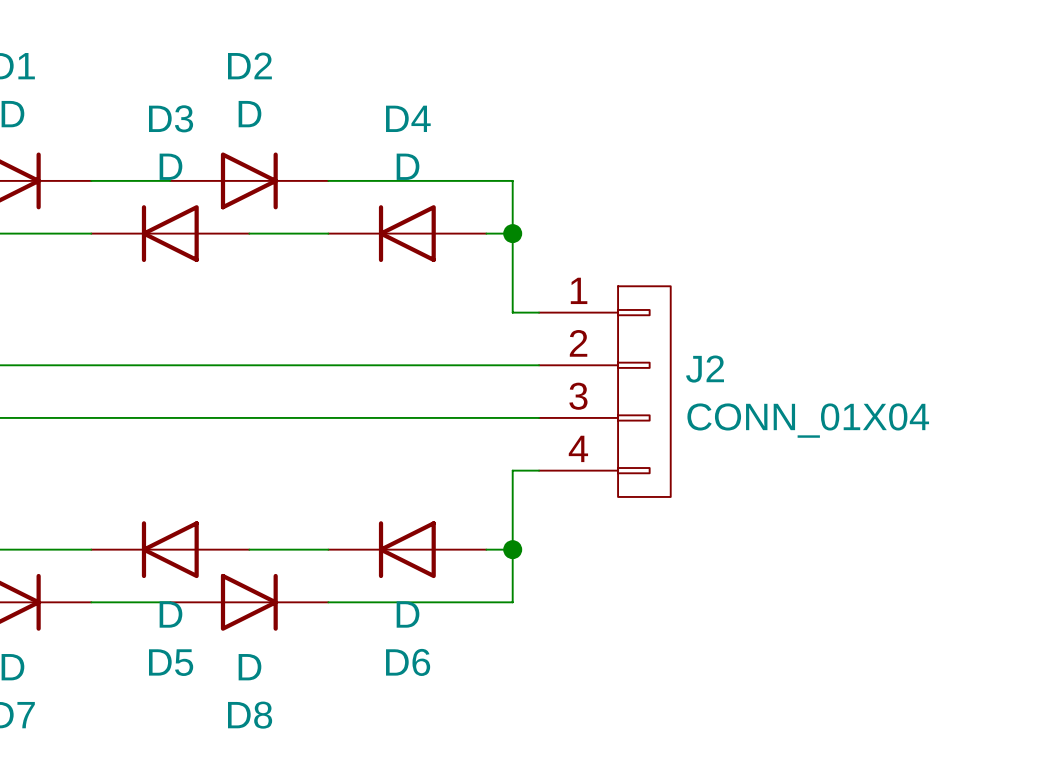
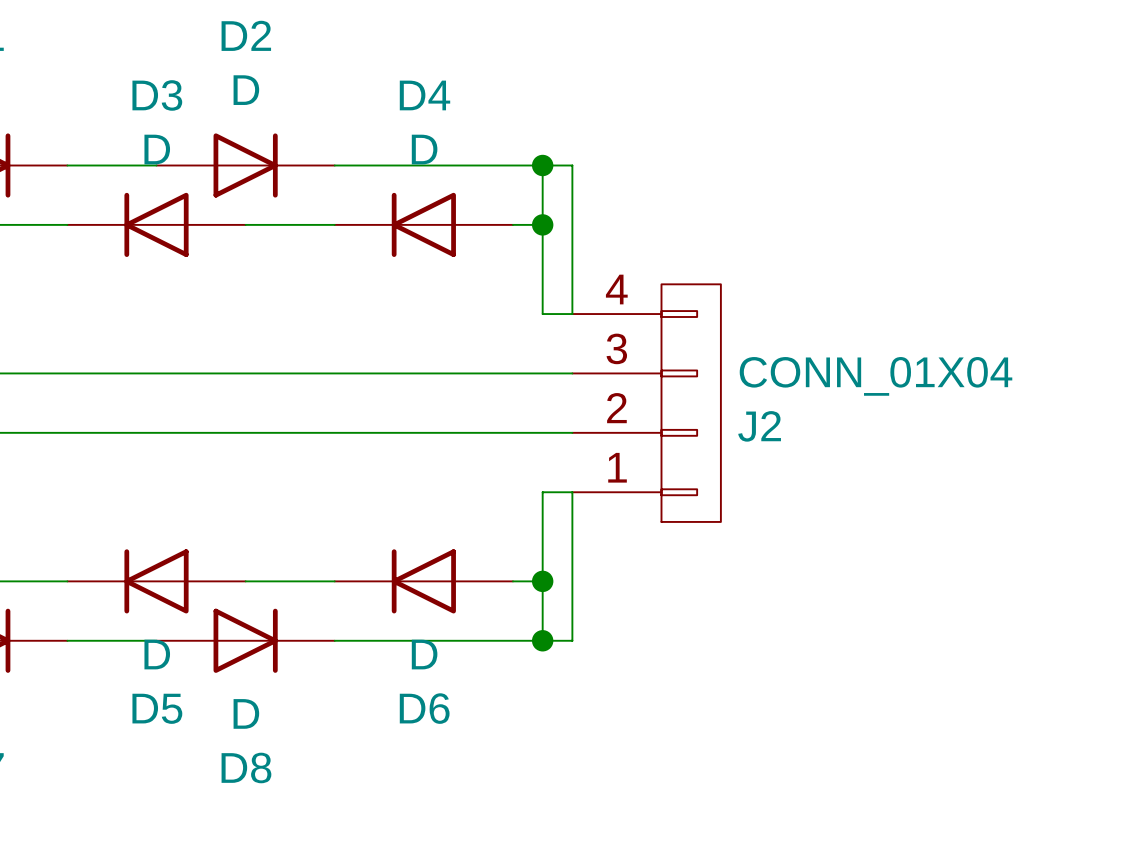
wire: none -> (542, 165) (572, 165) (572, 314)
junction: none -> (542, 165)
J2 flip: as is (644, 391) -> up-down (691, 403)
wire: none -> (572, 492) (572, 640) (542, 640)
junction: none -> (542, 640)

